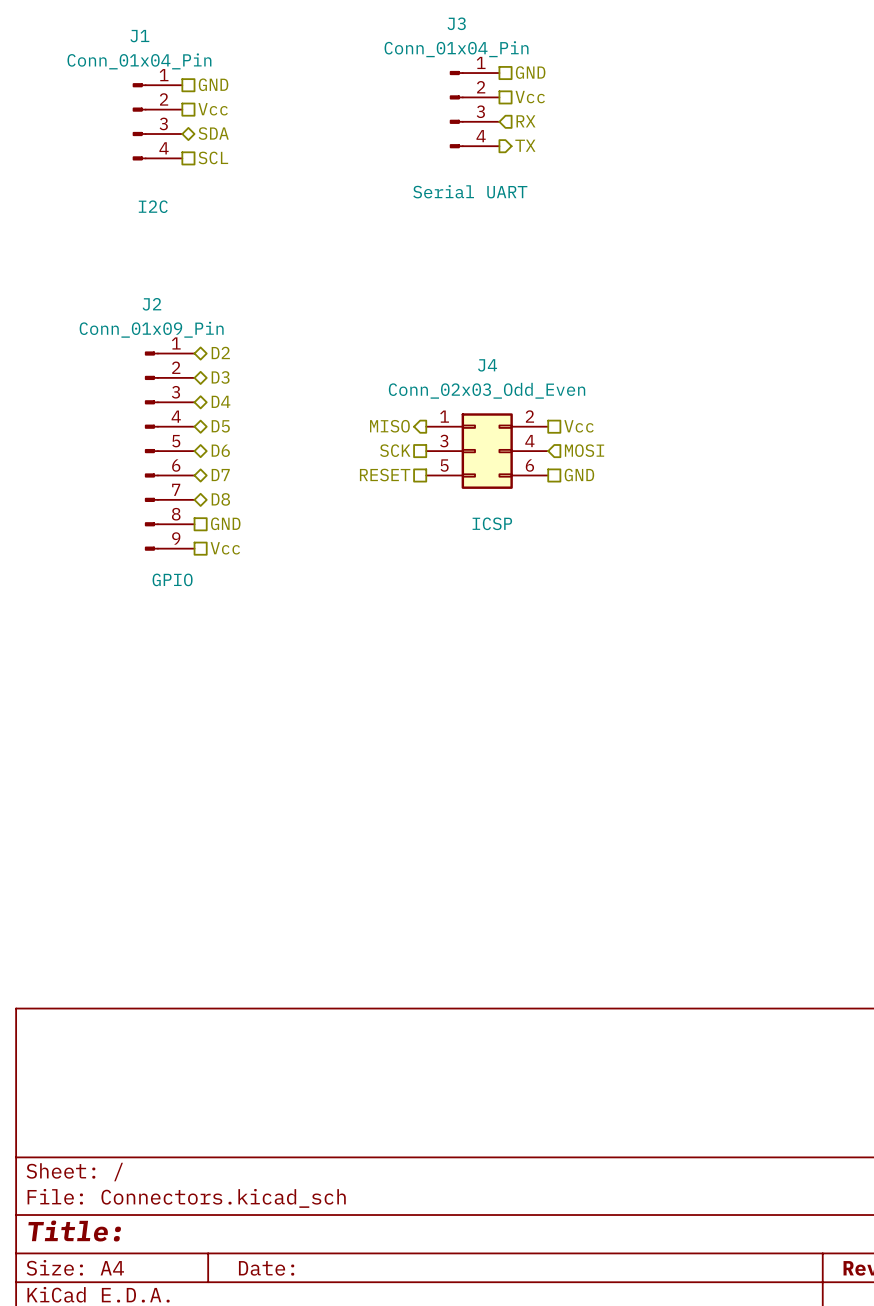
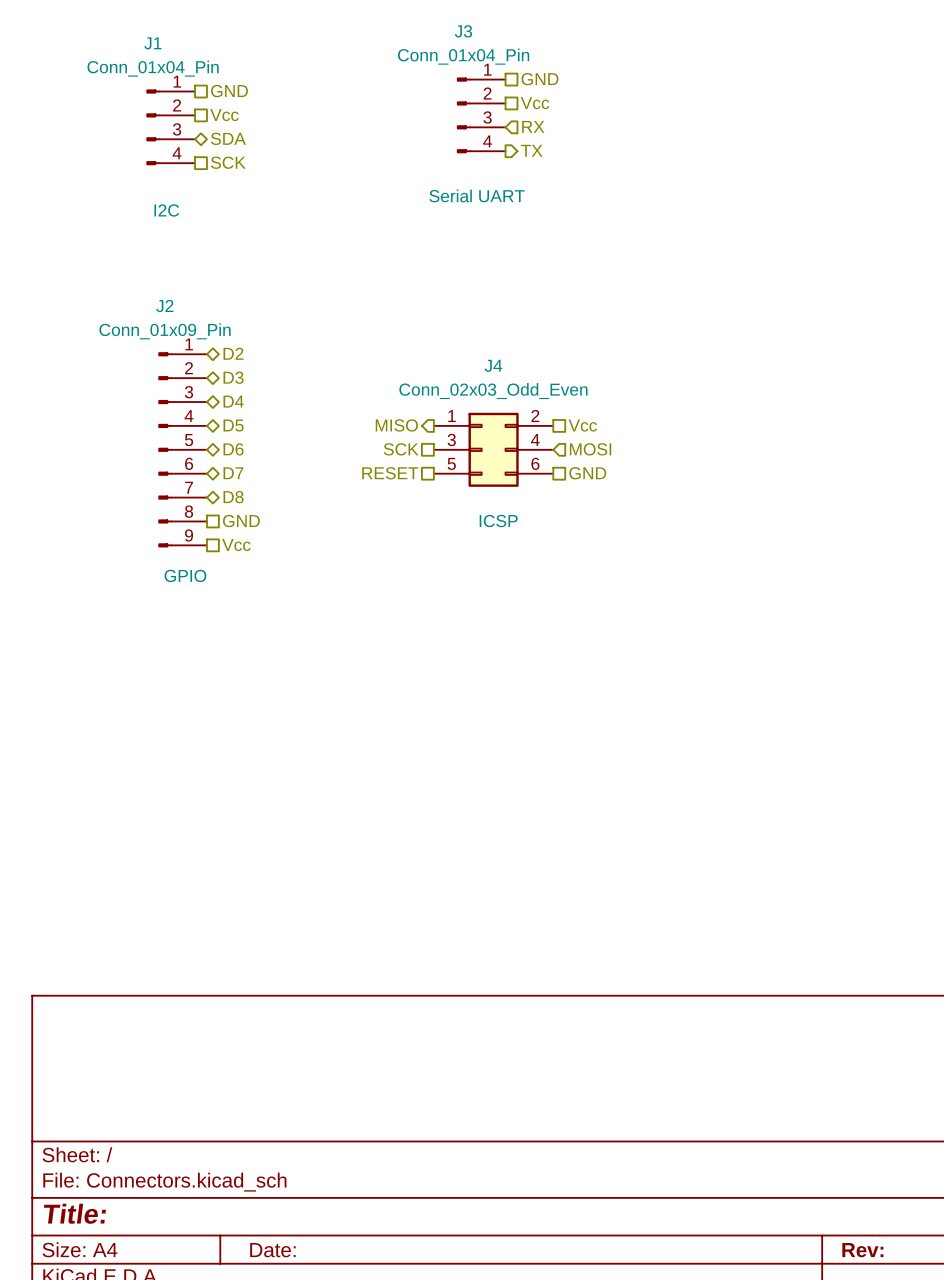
hierarchical label: SCL (213, 157) -> SCK (228, 162)

